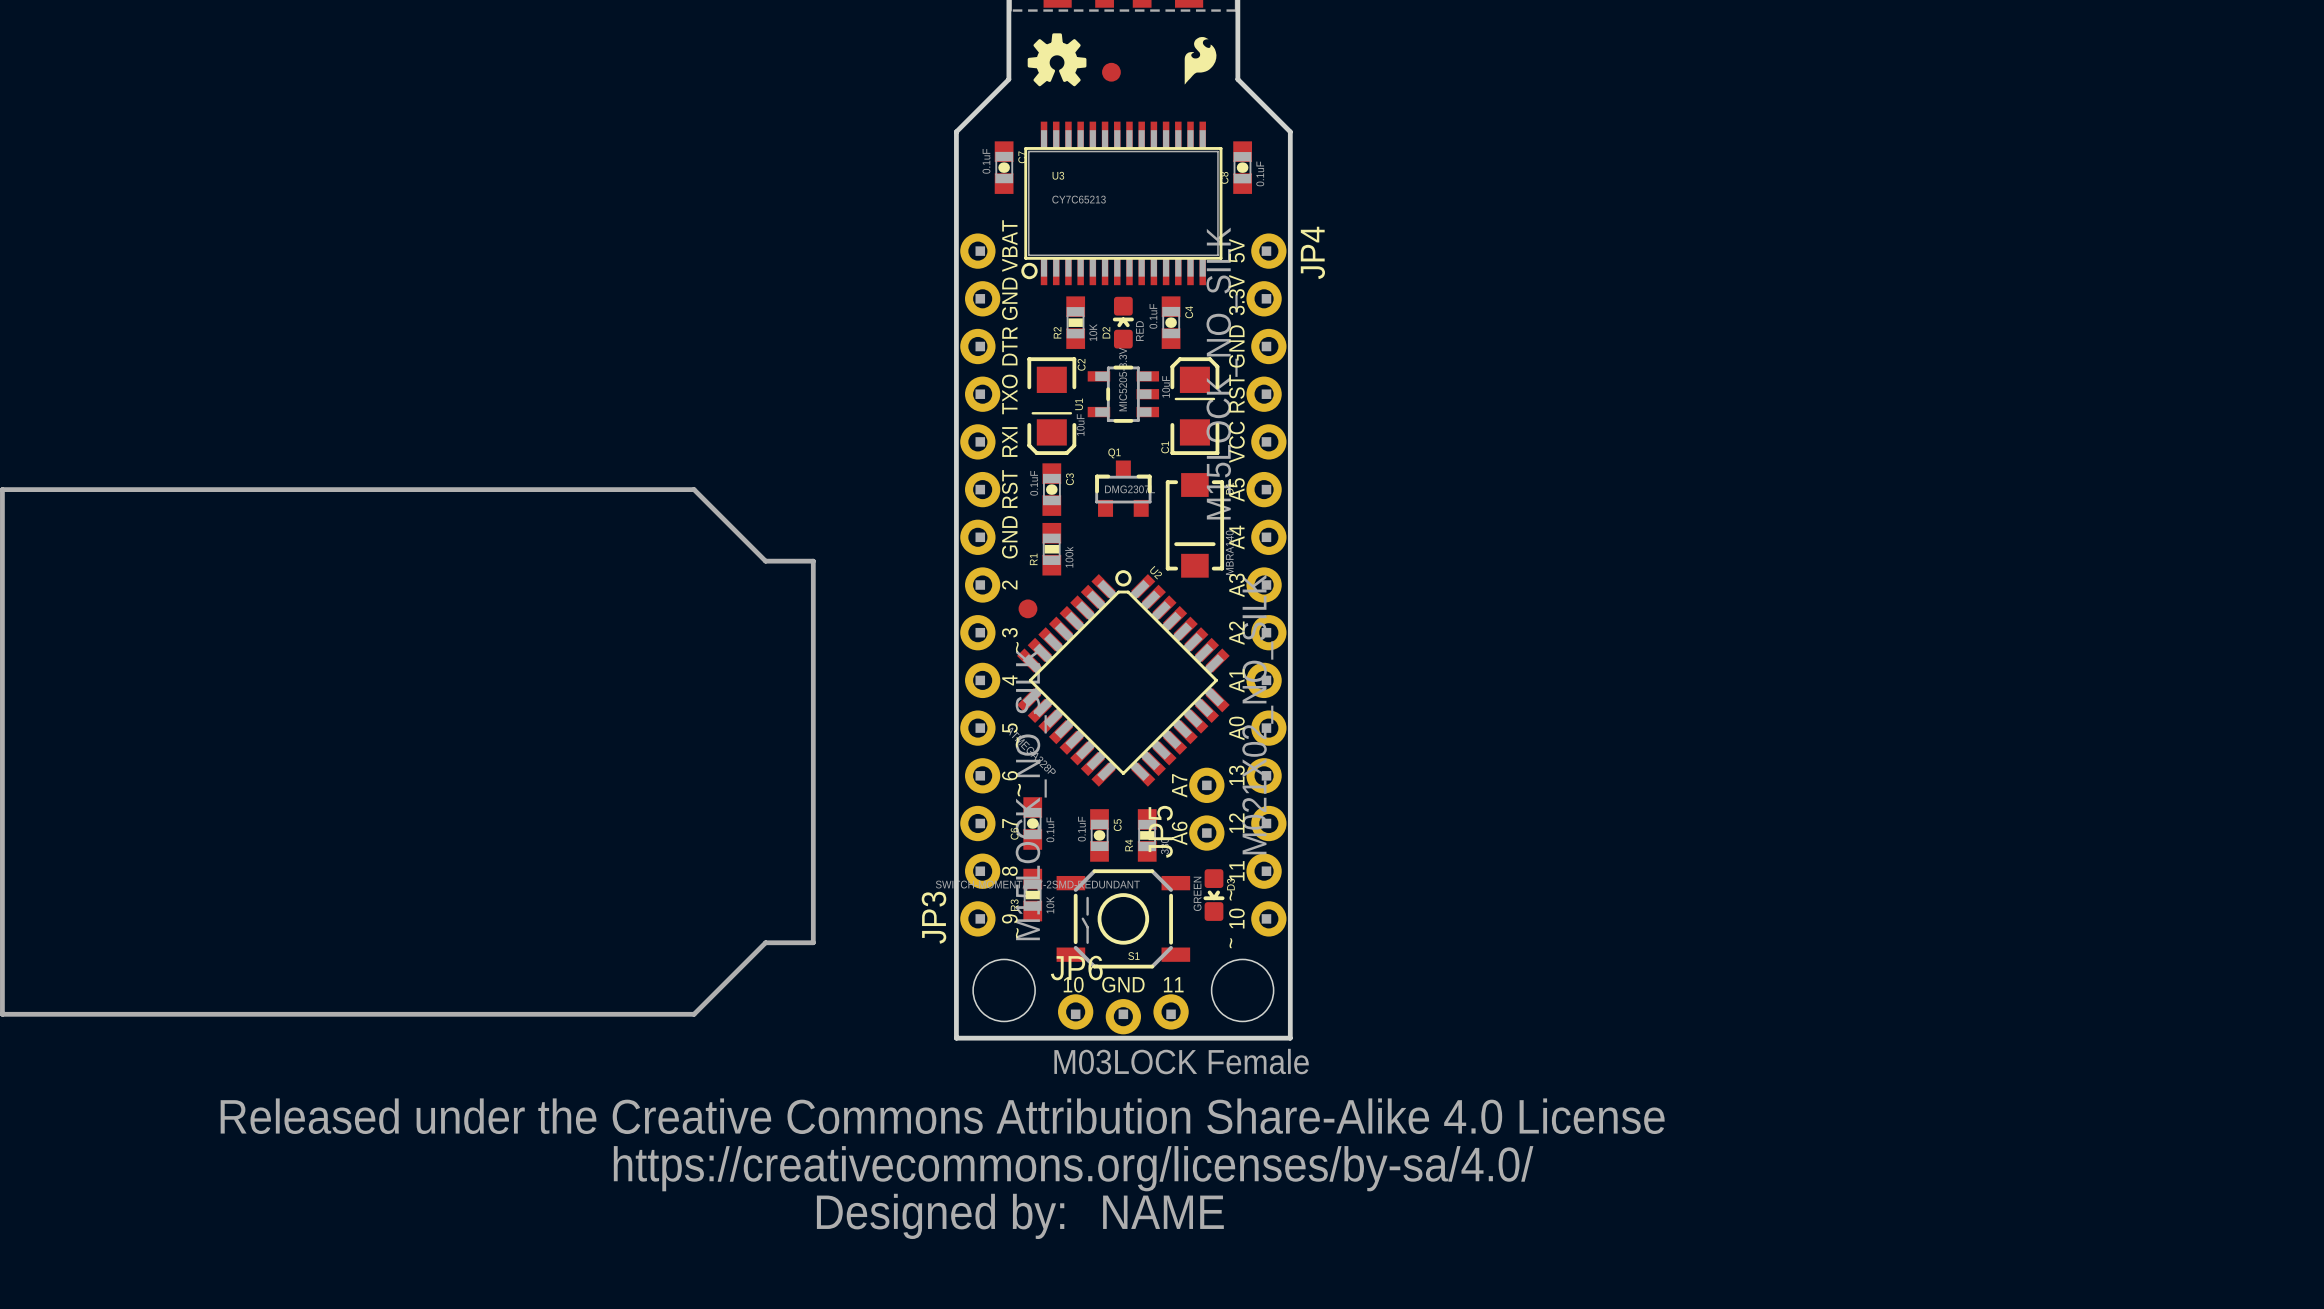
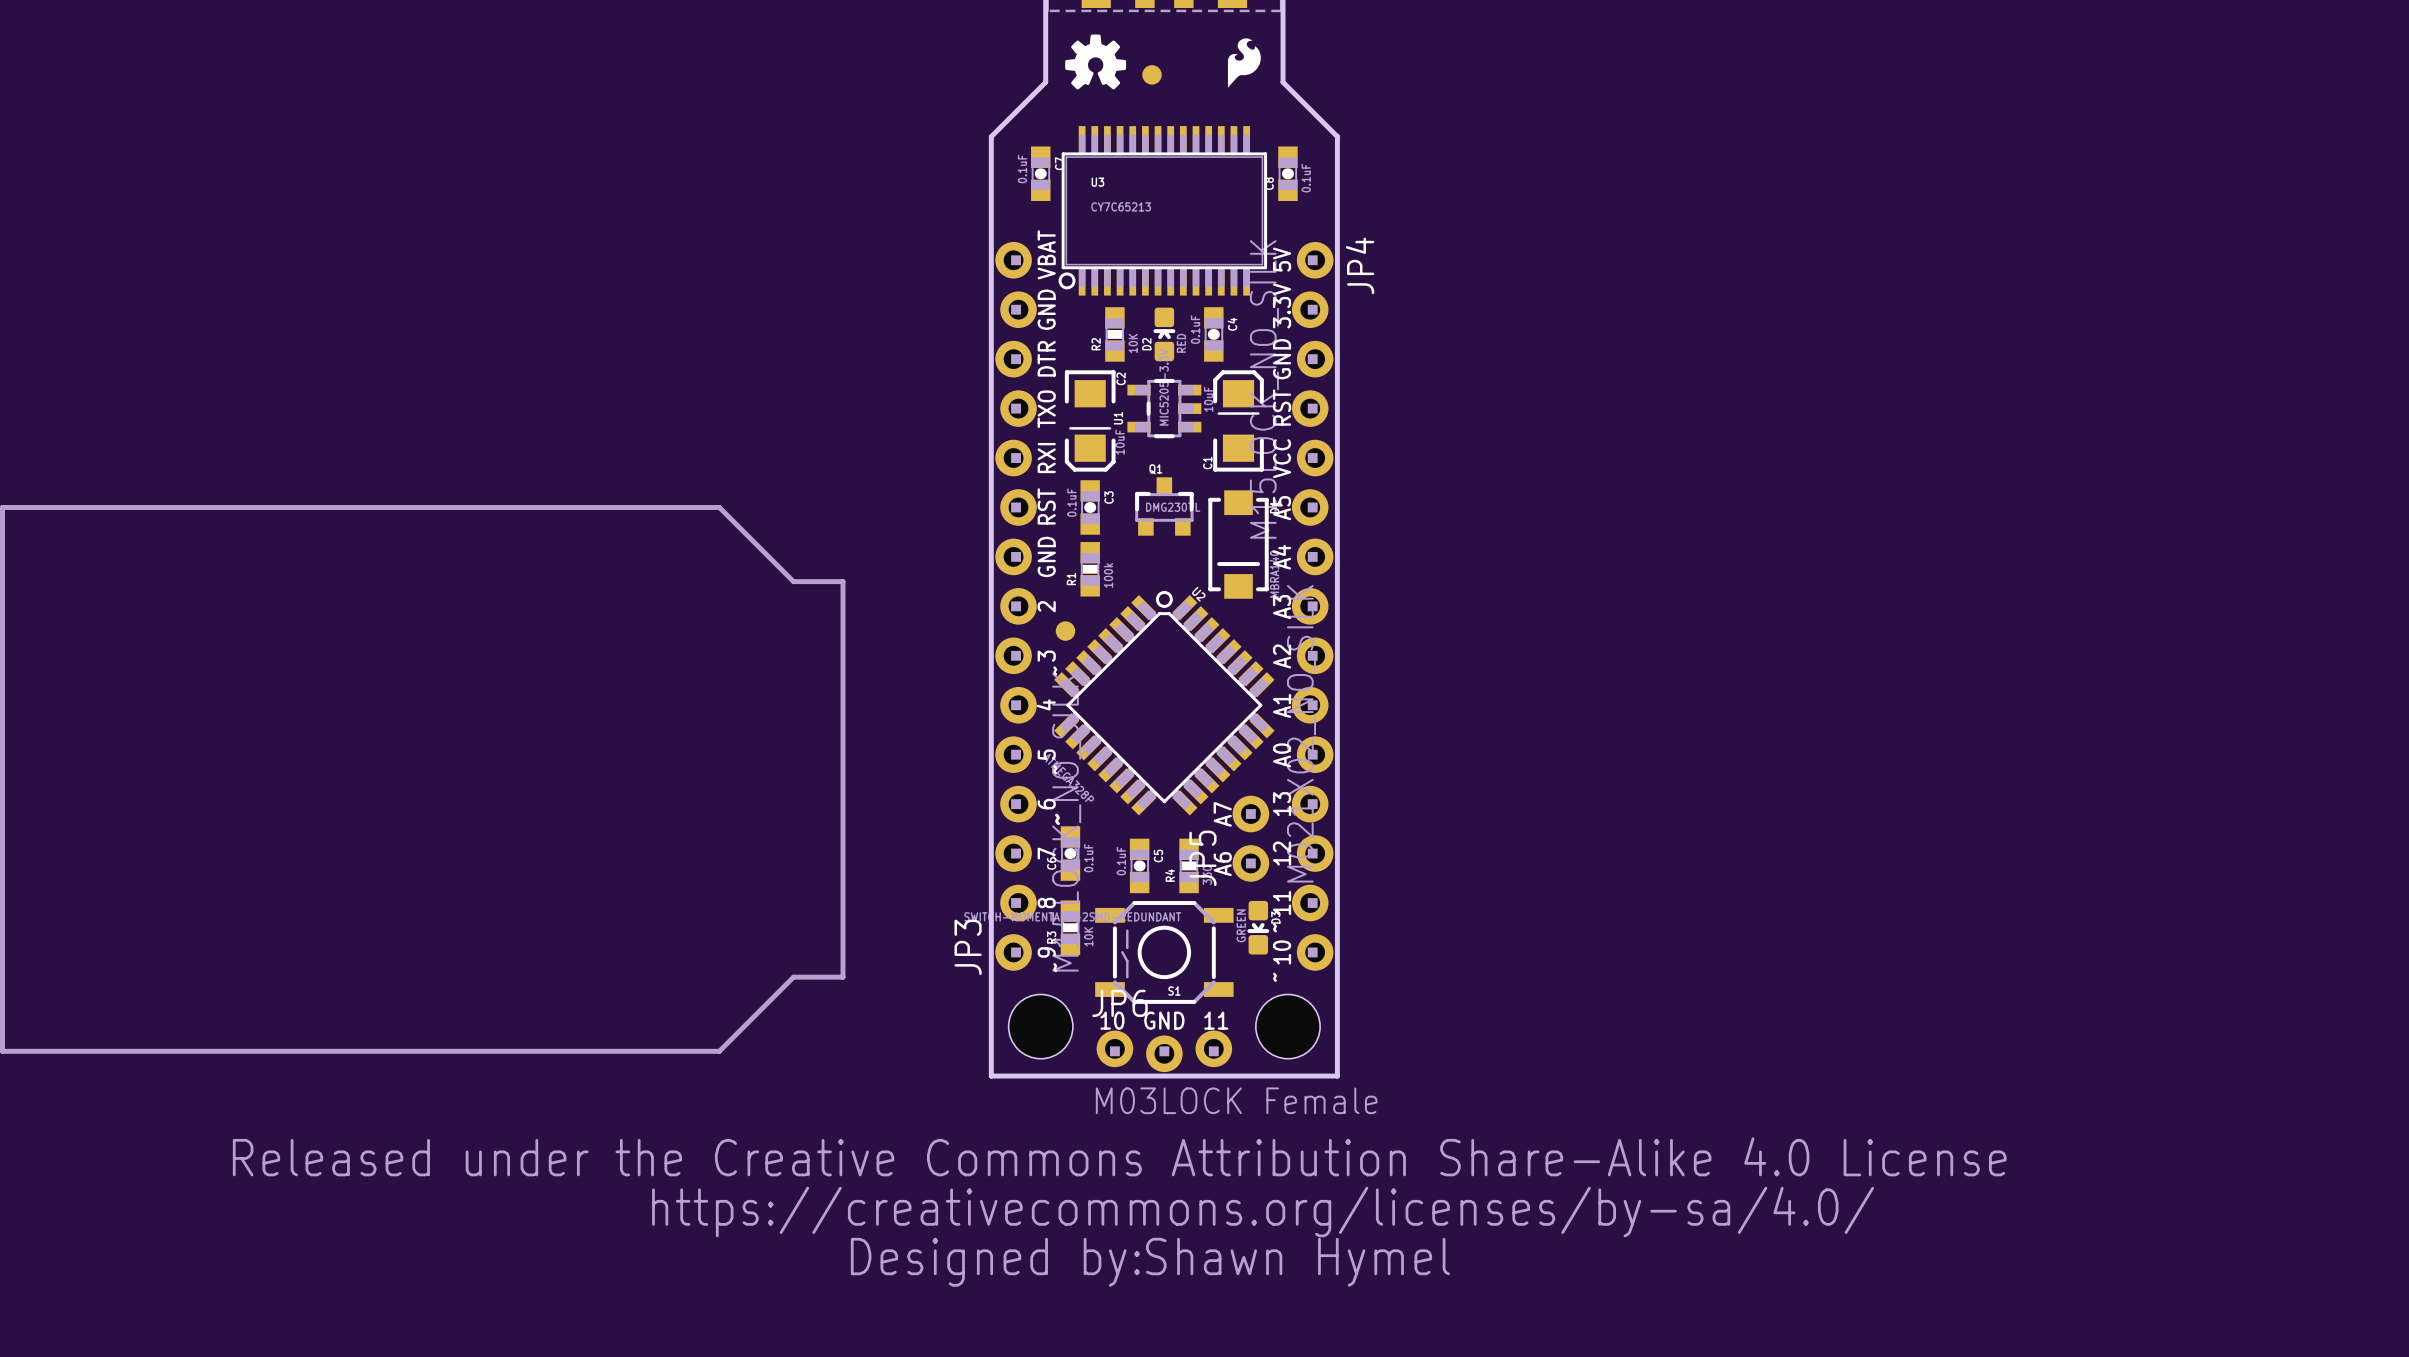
drawing shape: [220, 1098, 1665, 1240] -> [232, 1137, 2007, 1287]

